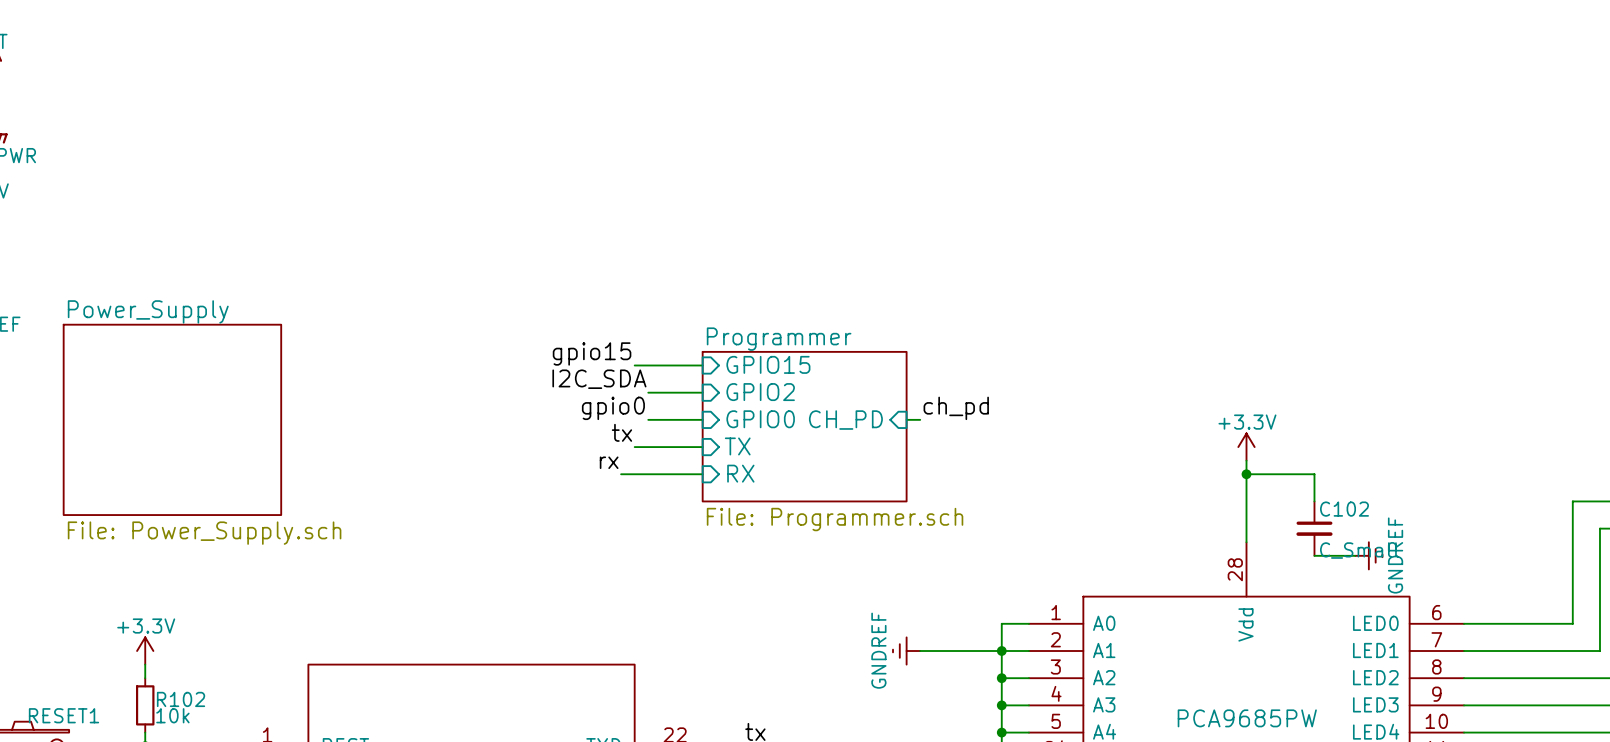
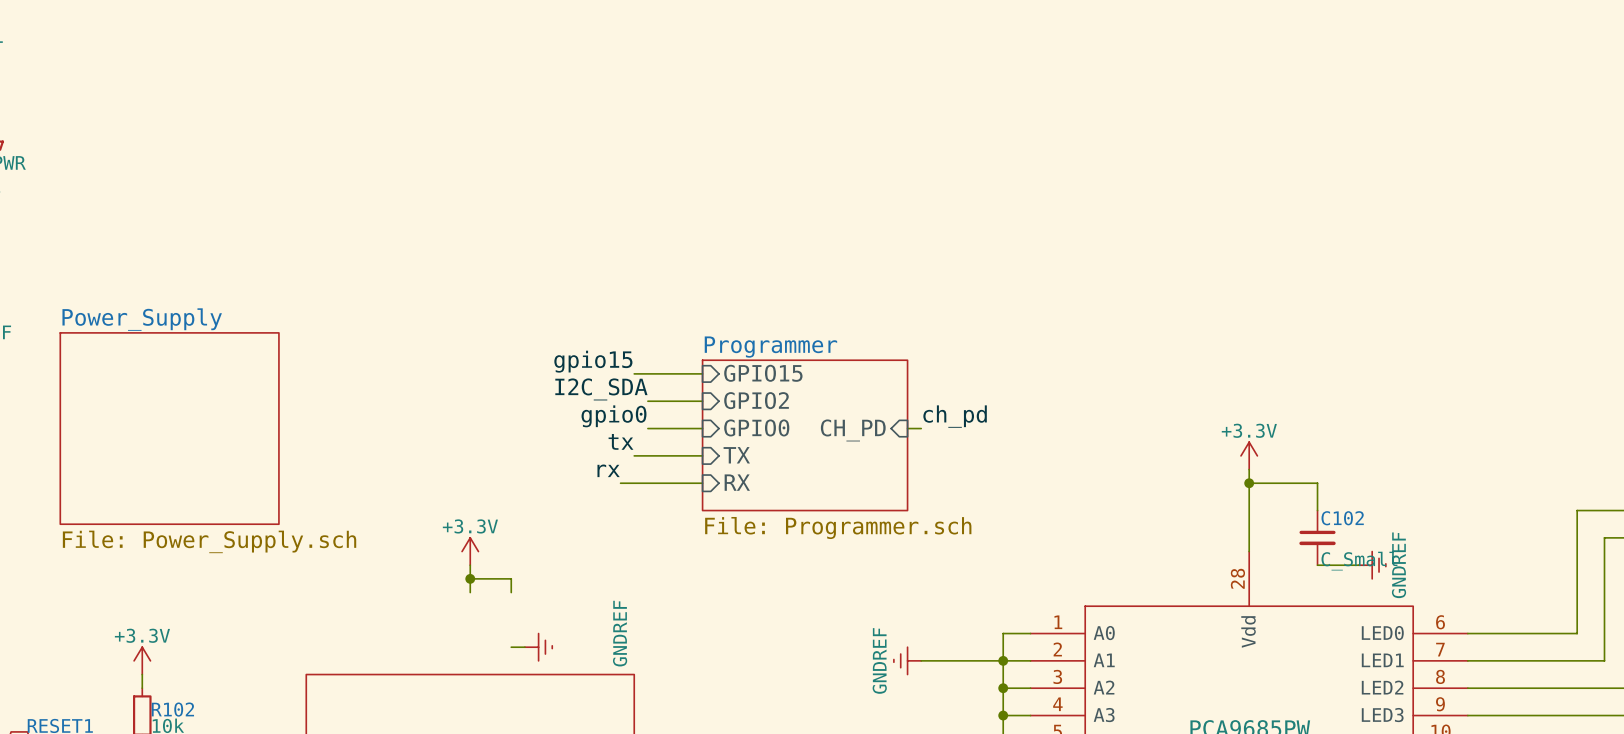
power symbol: none -> +3.3V (470, 551)
wire: none -> (470, 565) (470, 592)
wire: none -> (470, 578) (511, 578) (511, 592)
junction: none -> (470, 578)
wire: none -> (511, 647) (524, 647)
power symbol: none -> GNDREF (538, 647)

